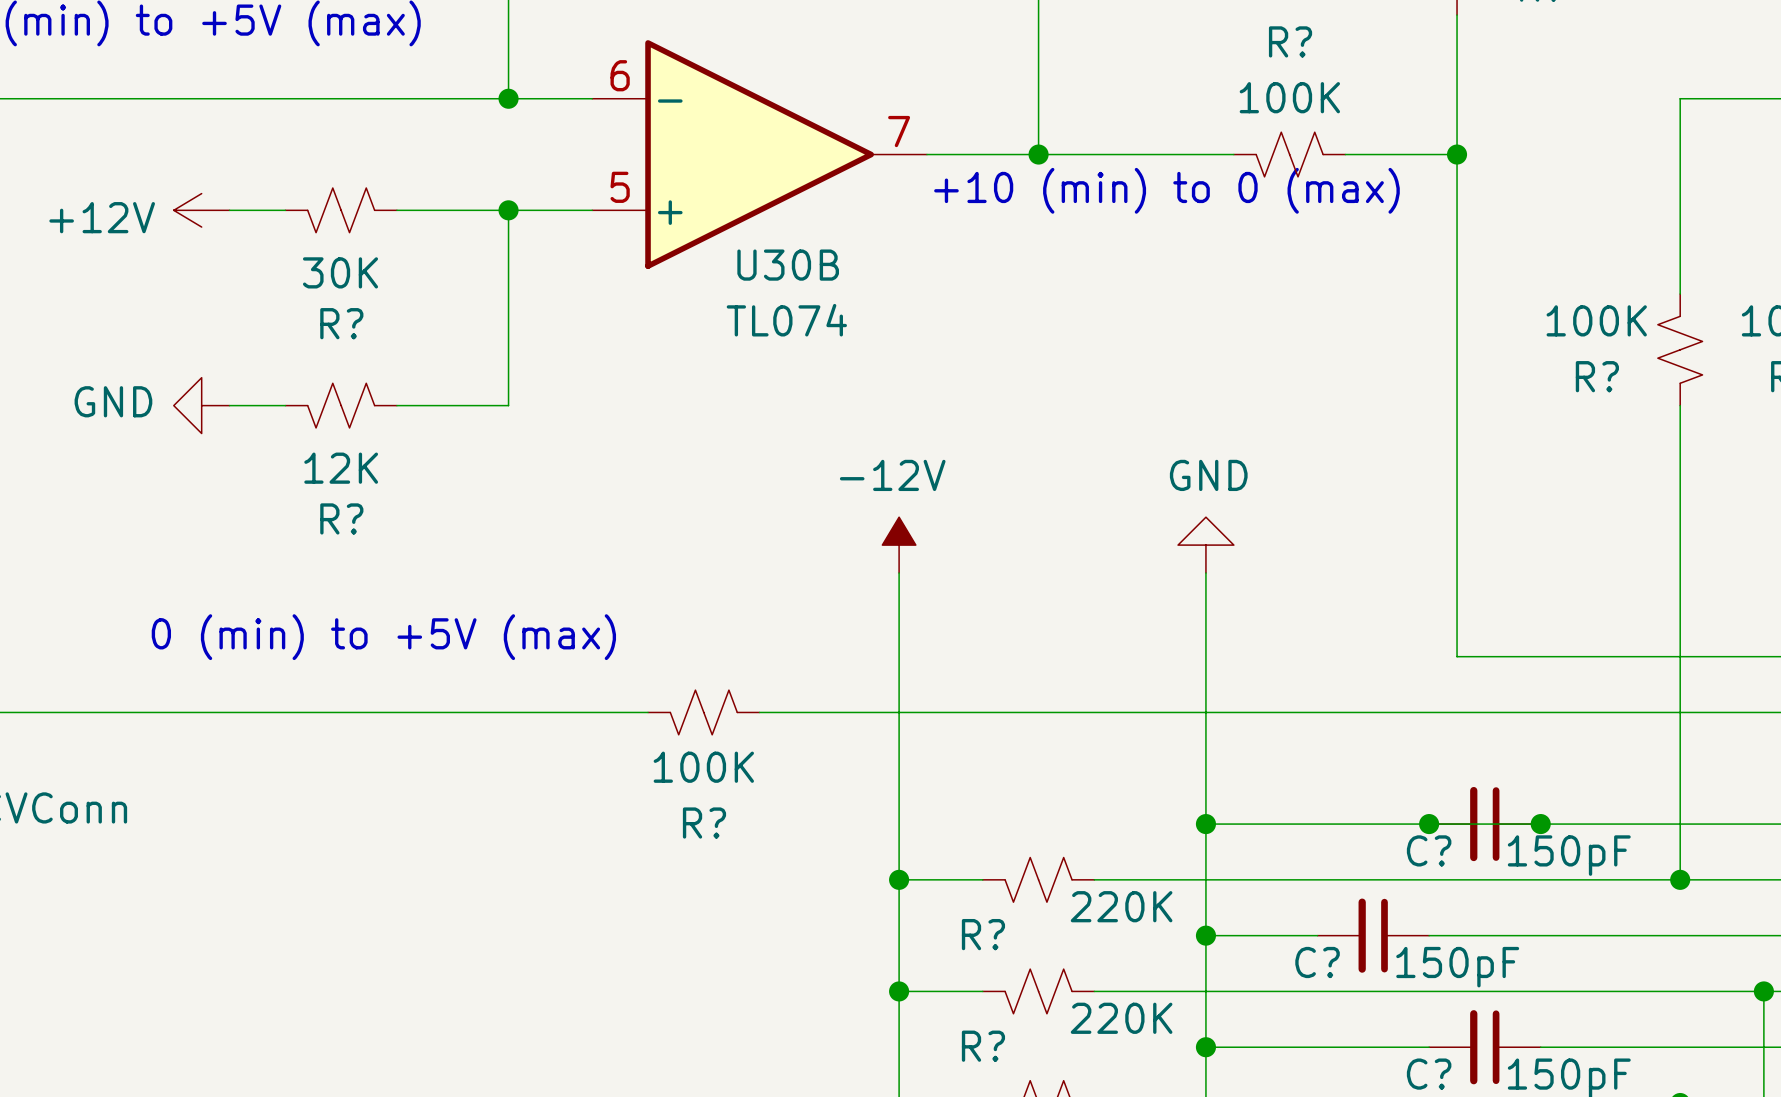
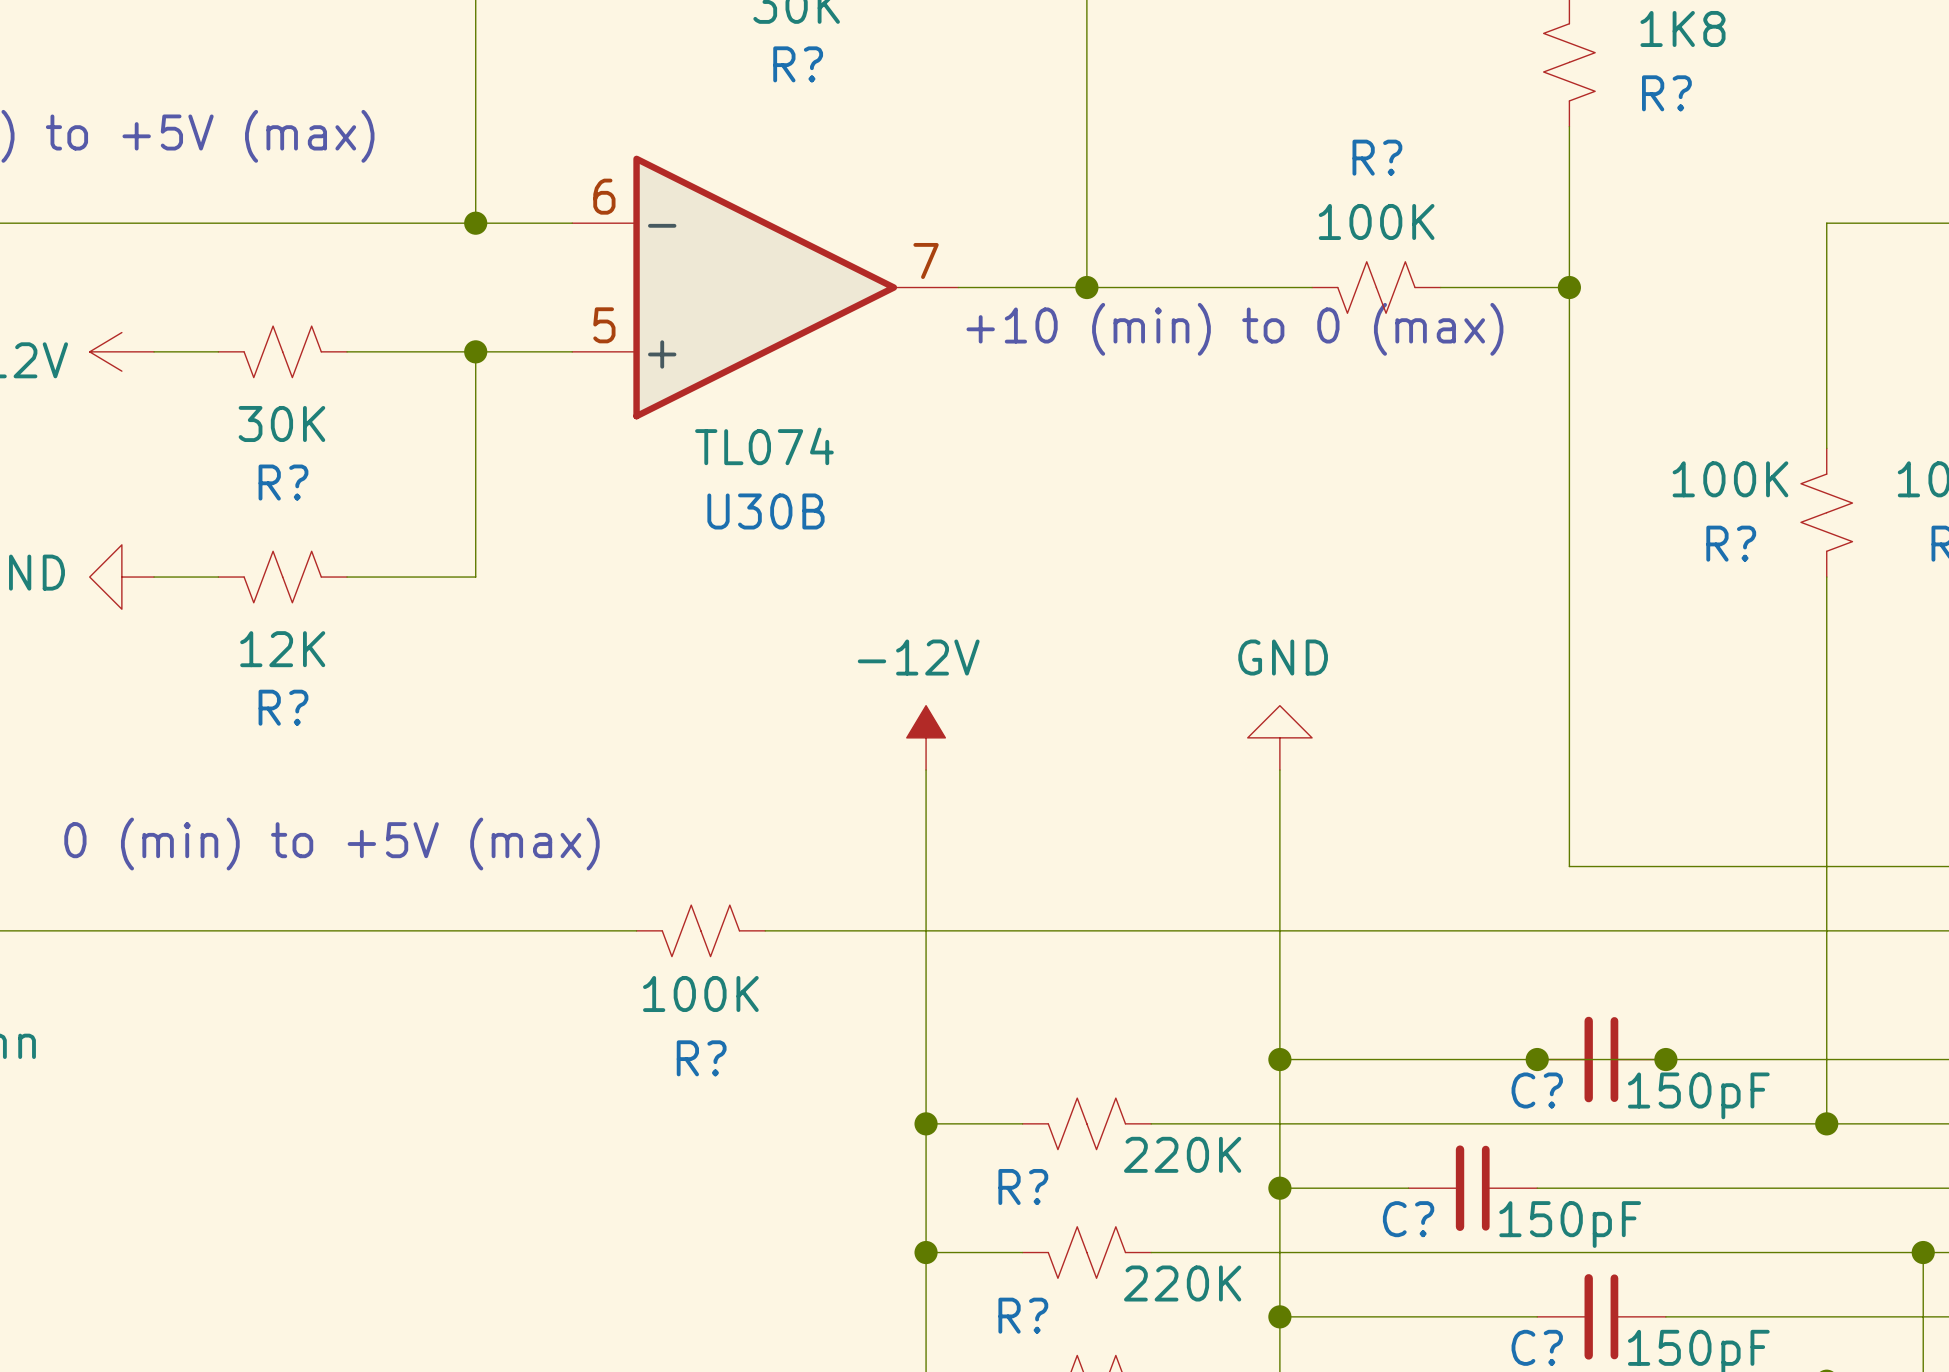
U30B name position: U30B (788, 265) -> U30B (765, 511)
U30B value position: TL074 (786, 320) -> TL074 (764, 446)

